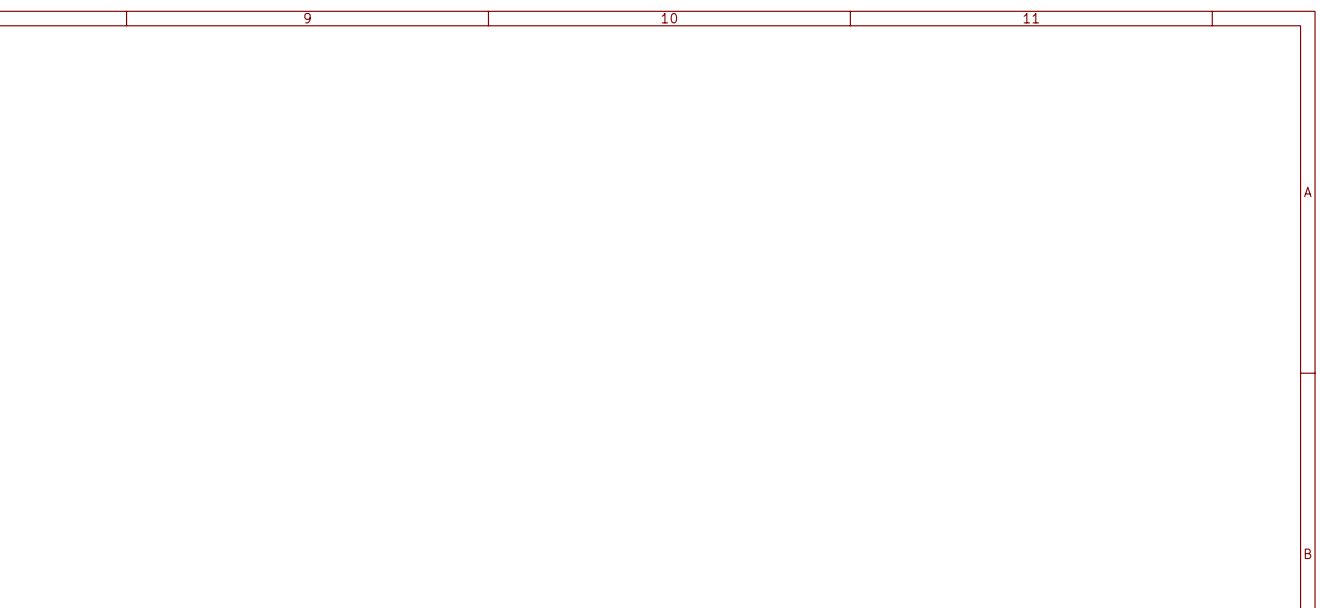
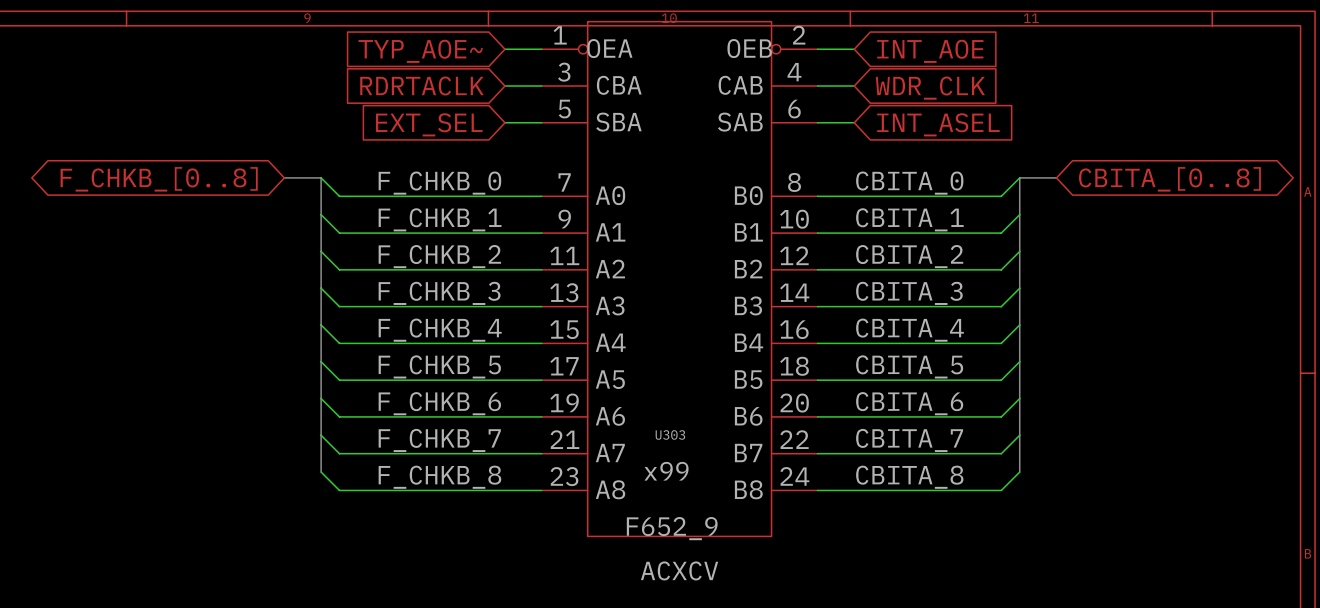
wire: none -> (504, 49) (541, 49)
wire: none -> (817, 49) (854, 49)
global label: none -> TYP_AOE~ (420, 51)
global label: none -> INT_AOE (930, 51)
global label: none -> RDRTACLK (421, 86)
wire: none -> (504, 86) (541, 86)
wire: none -> (817, 86) (854, 86)
global label: none -> WDR_CLK (930, 88)
wire: none -> (504, 122) (541, 122)
wire: none -> (817, 122) (854, 122)
global label: none -> EXT_SEL (429, 124)
global label: none -> INT_ASEL (938, 124)
bus: none -> (284, 177) (321, 177) (321, 472)
wire: none -> (321, 177) (339, 196) (541, 196)
wire: none -> (1019, 177) (1001, 196) (817, 196)
bus: none -> (1056, 177) (1019, 177) (1019, 472)
global label: none -> F_CHKB_[0..8] (159, 179)
global label: none -> CBITA_[0..8] (1169, 179)
label: none -> F_CHKB_0 (439, 183)
label: none -> CBITA_0 (909, 183)
wire: none -> (321, 214) (339, 233) (541, 233)
wire: none -> (1019, 214) (1001, 233) (817, 233)
label: none -> F_CHKB_1 (440, 219)
label: none -> CBITA_1 (909, 219)
wire: none -> (321, 251) (339, 269) (541, 269)
wire: none -> (1019, 251) (1001, 269) (817, 269)
label: none -> F_CHKB_2 (439, 256)
label: none -> CBITA_2 (909, 256)
U303: none -> F652_9 (679, 279)
wire: none -> (321, 288) (339, 306) (541, 306)
wire: none -> (1019, 288) (1001, 306) (817, 306)
label: none -> F_CHKB_3 (439, 293)
label: none -> CBITA_3 (909, 293)
wire: none -> (321, 325) (339, 343) (541, 343)
wire: none -> (1019, 325) (1001, 343) (817, 343)
label: none -> F_CHKB_4 (440, 330)
label: none -> CBITA_4 (910, 330)
wire: none -> (321, 361) (339, 380) (541, 380)
wire: none -> (1019, 361) (1001, 380) (817, 380)
label: none -> F_CHKB_5 (439, 366)
label: none -> CBITA_5 (909, 366)
wire: none -> (321, 398) (339, 416) (541, 416)
wire: none -> (1019, 398) (1001, 416) (817, 416)
label: none -> F_CHKB_6 (439, 403)
label: none -> CBITA_6 (909, 403)
wire: none -> (321, 435) (339, 453) (541, 453)
wire: none -> (1019, 435) (1001, 453) (817, 453)
label: none -> F_CHKB_7 (439, 440)
label: none -> CBITA_7 (909, 440)
wire: none -> (321, 472) (339, 490) (541, 490)
wire: none -> (1019, 472) (1001, 490) (817, 490)
label: none -> F_CHKB_8 (439, 477)
label: none -> CBITA_8 (909, 477)

